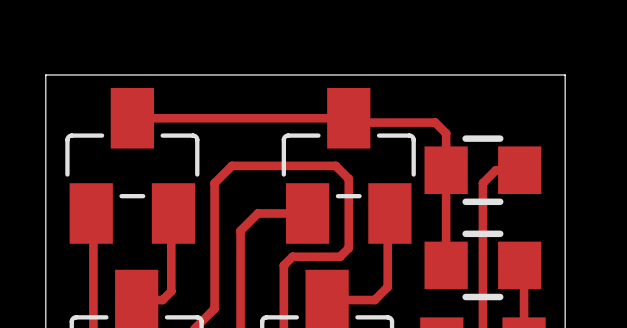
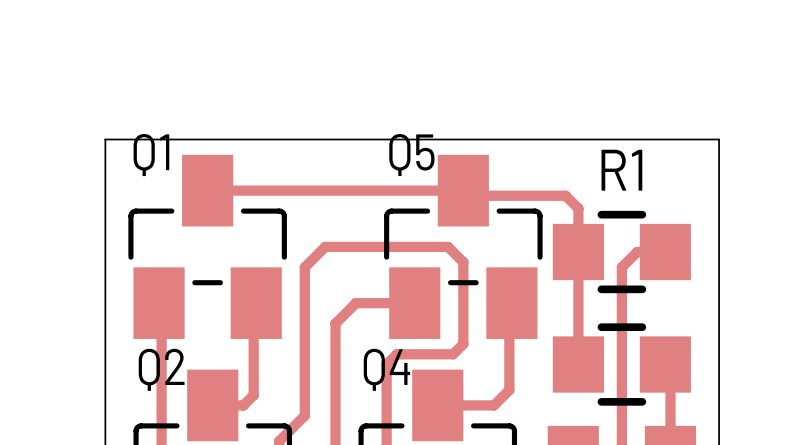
Q1 name: none -> Q1 (151, 155)
Q5 name: none -> Q5 (411, 155)
R1 name: none -> R1 (621, 170)
Q4 name: none -> Q4 (386, 369)
Q2 name: none -> Q2 (161, 369)

